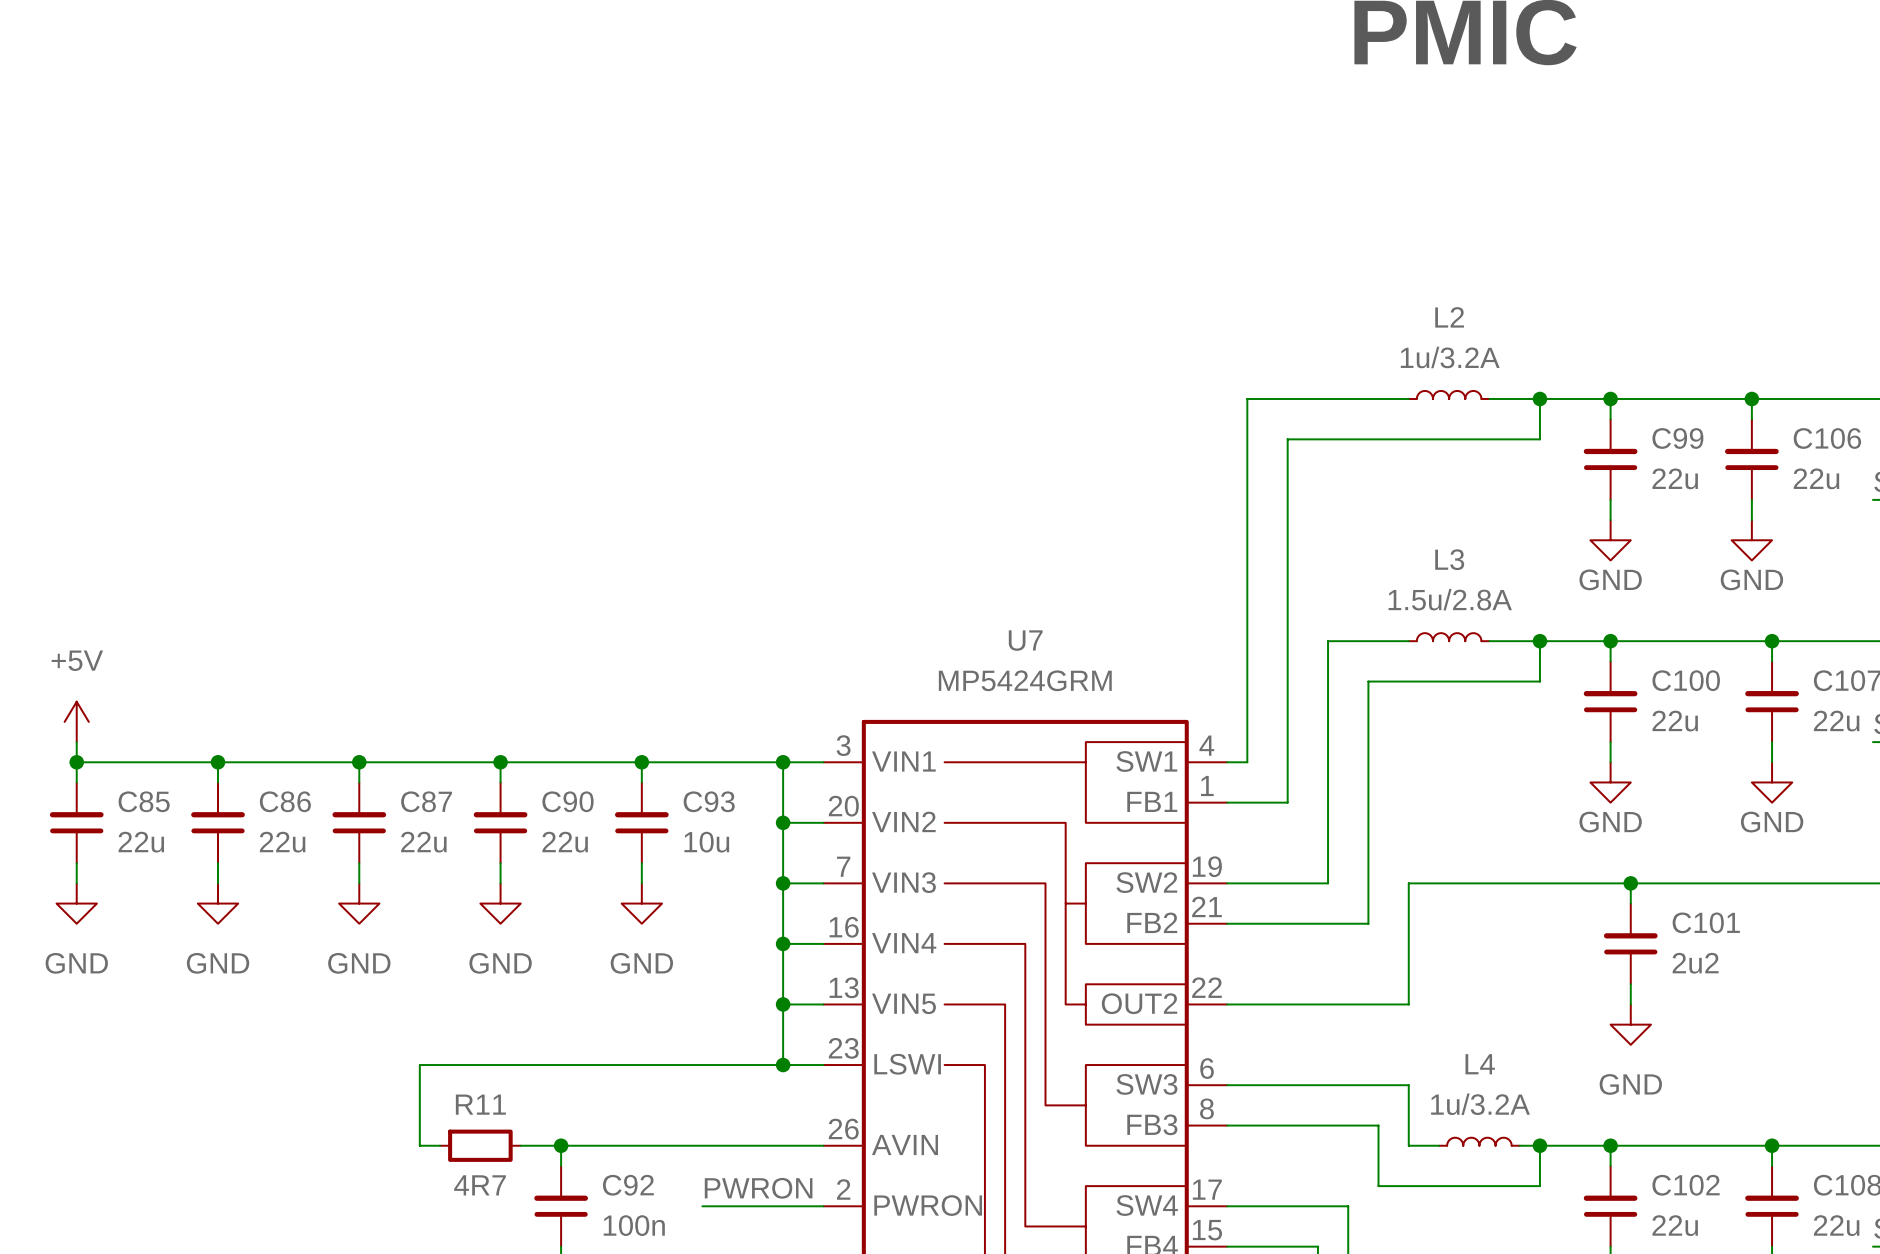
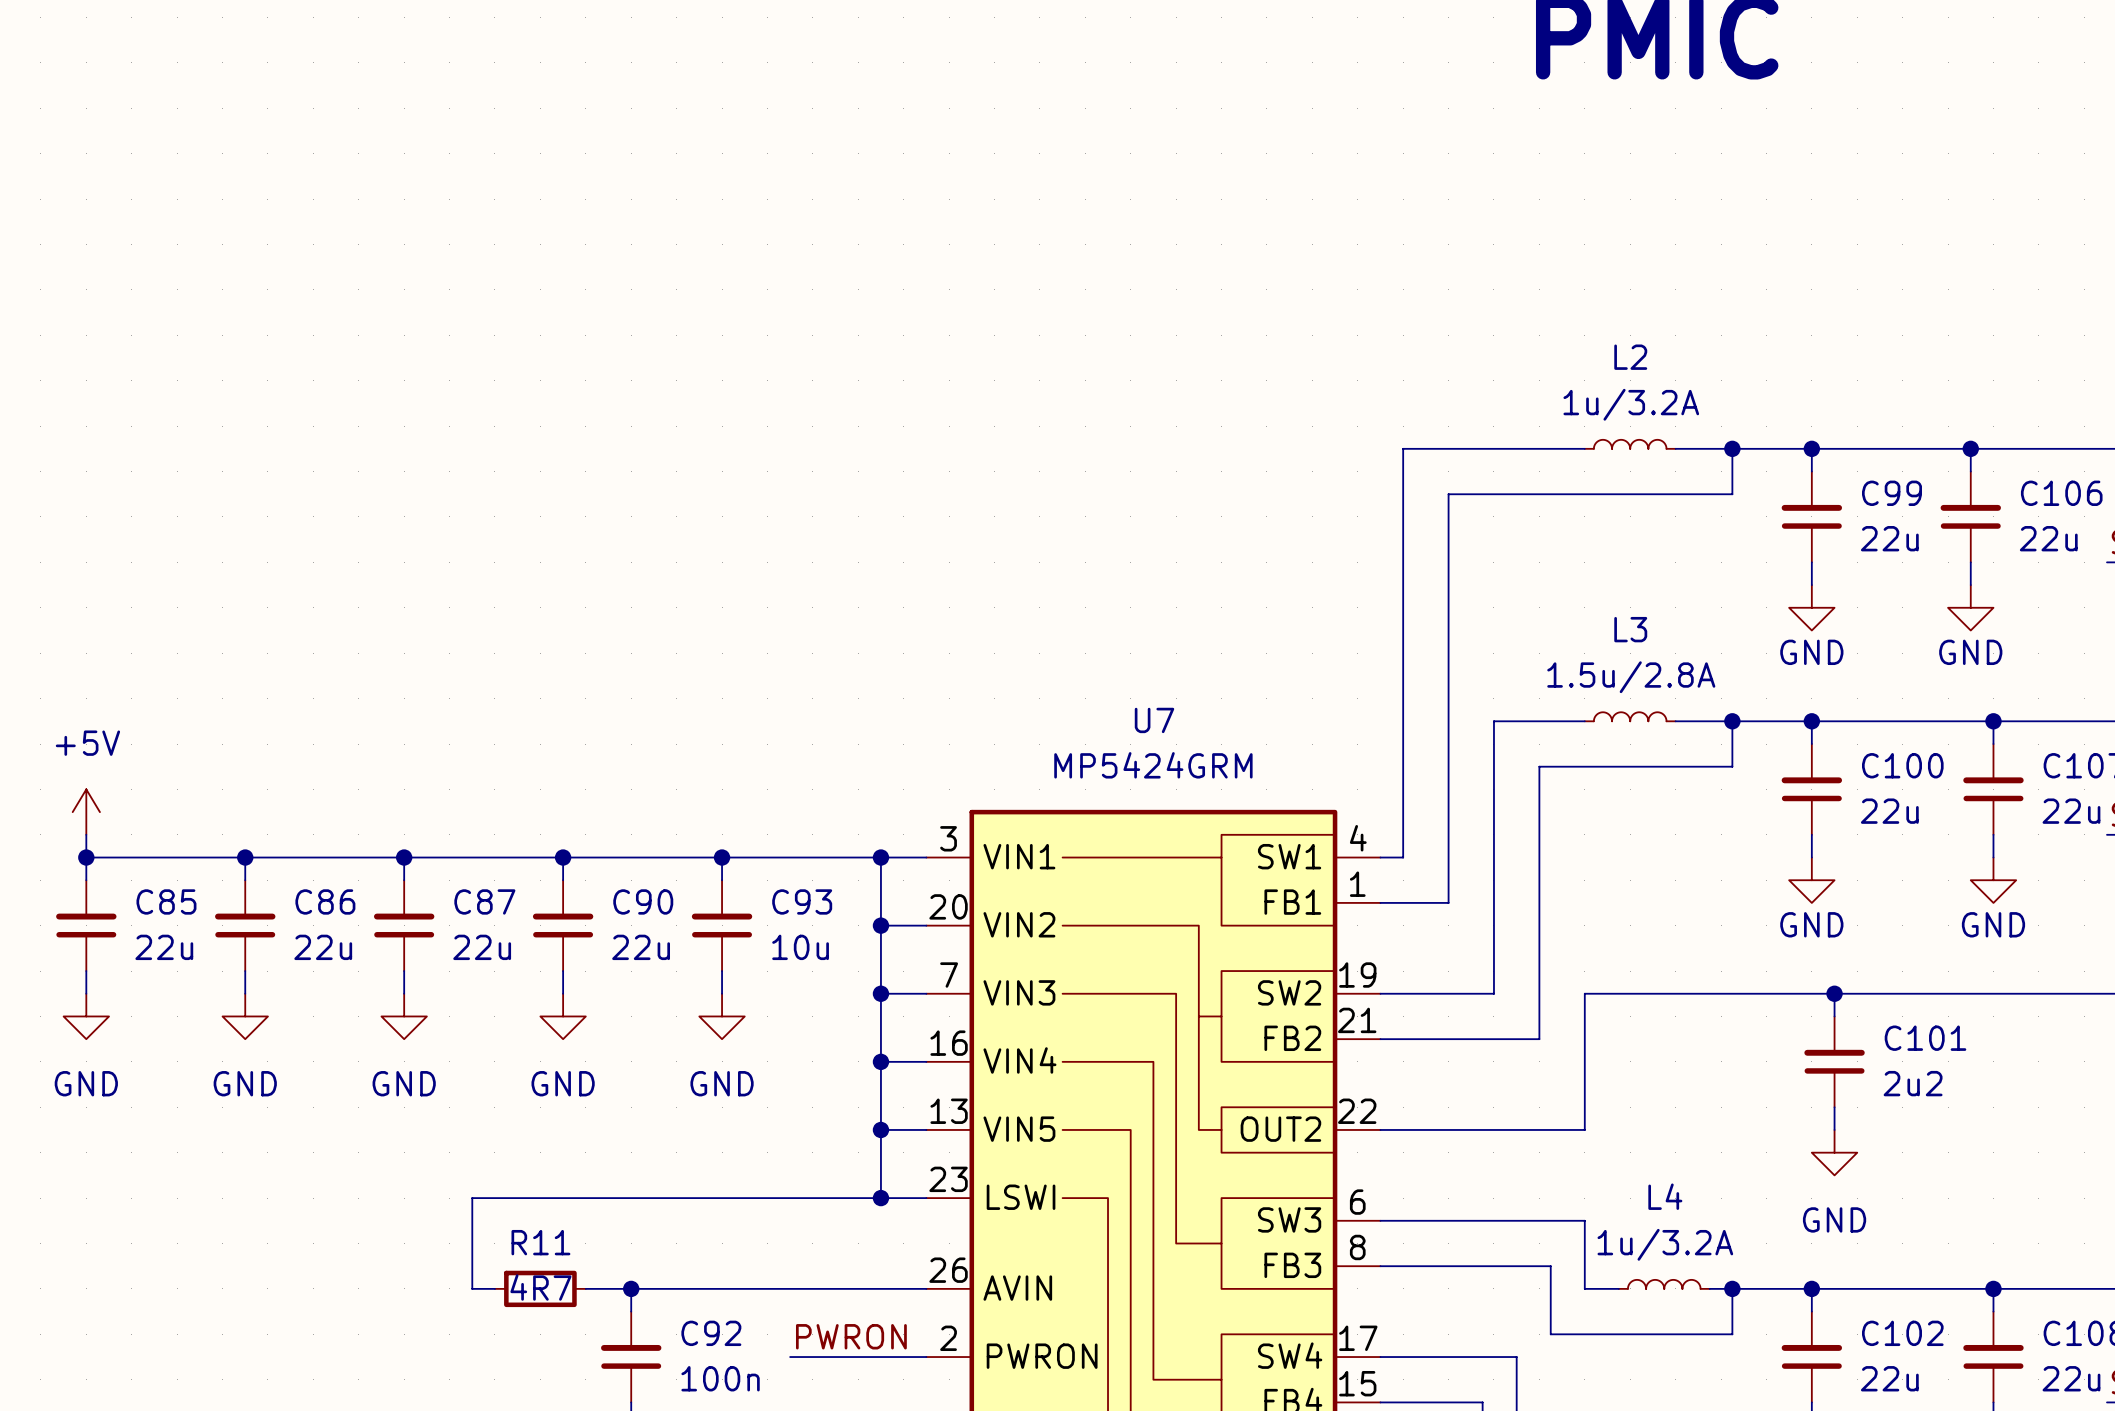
R11 text position: 4R7 (479, 1185) -> 4R7 (540, 1287)

